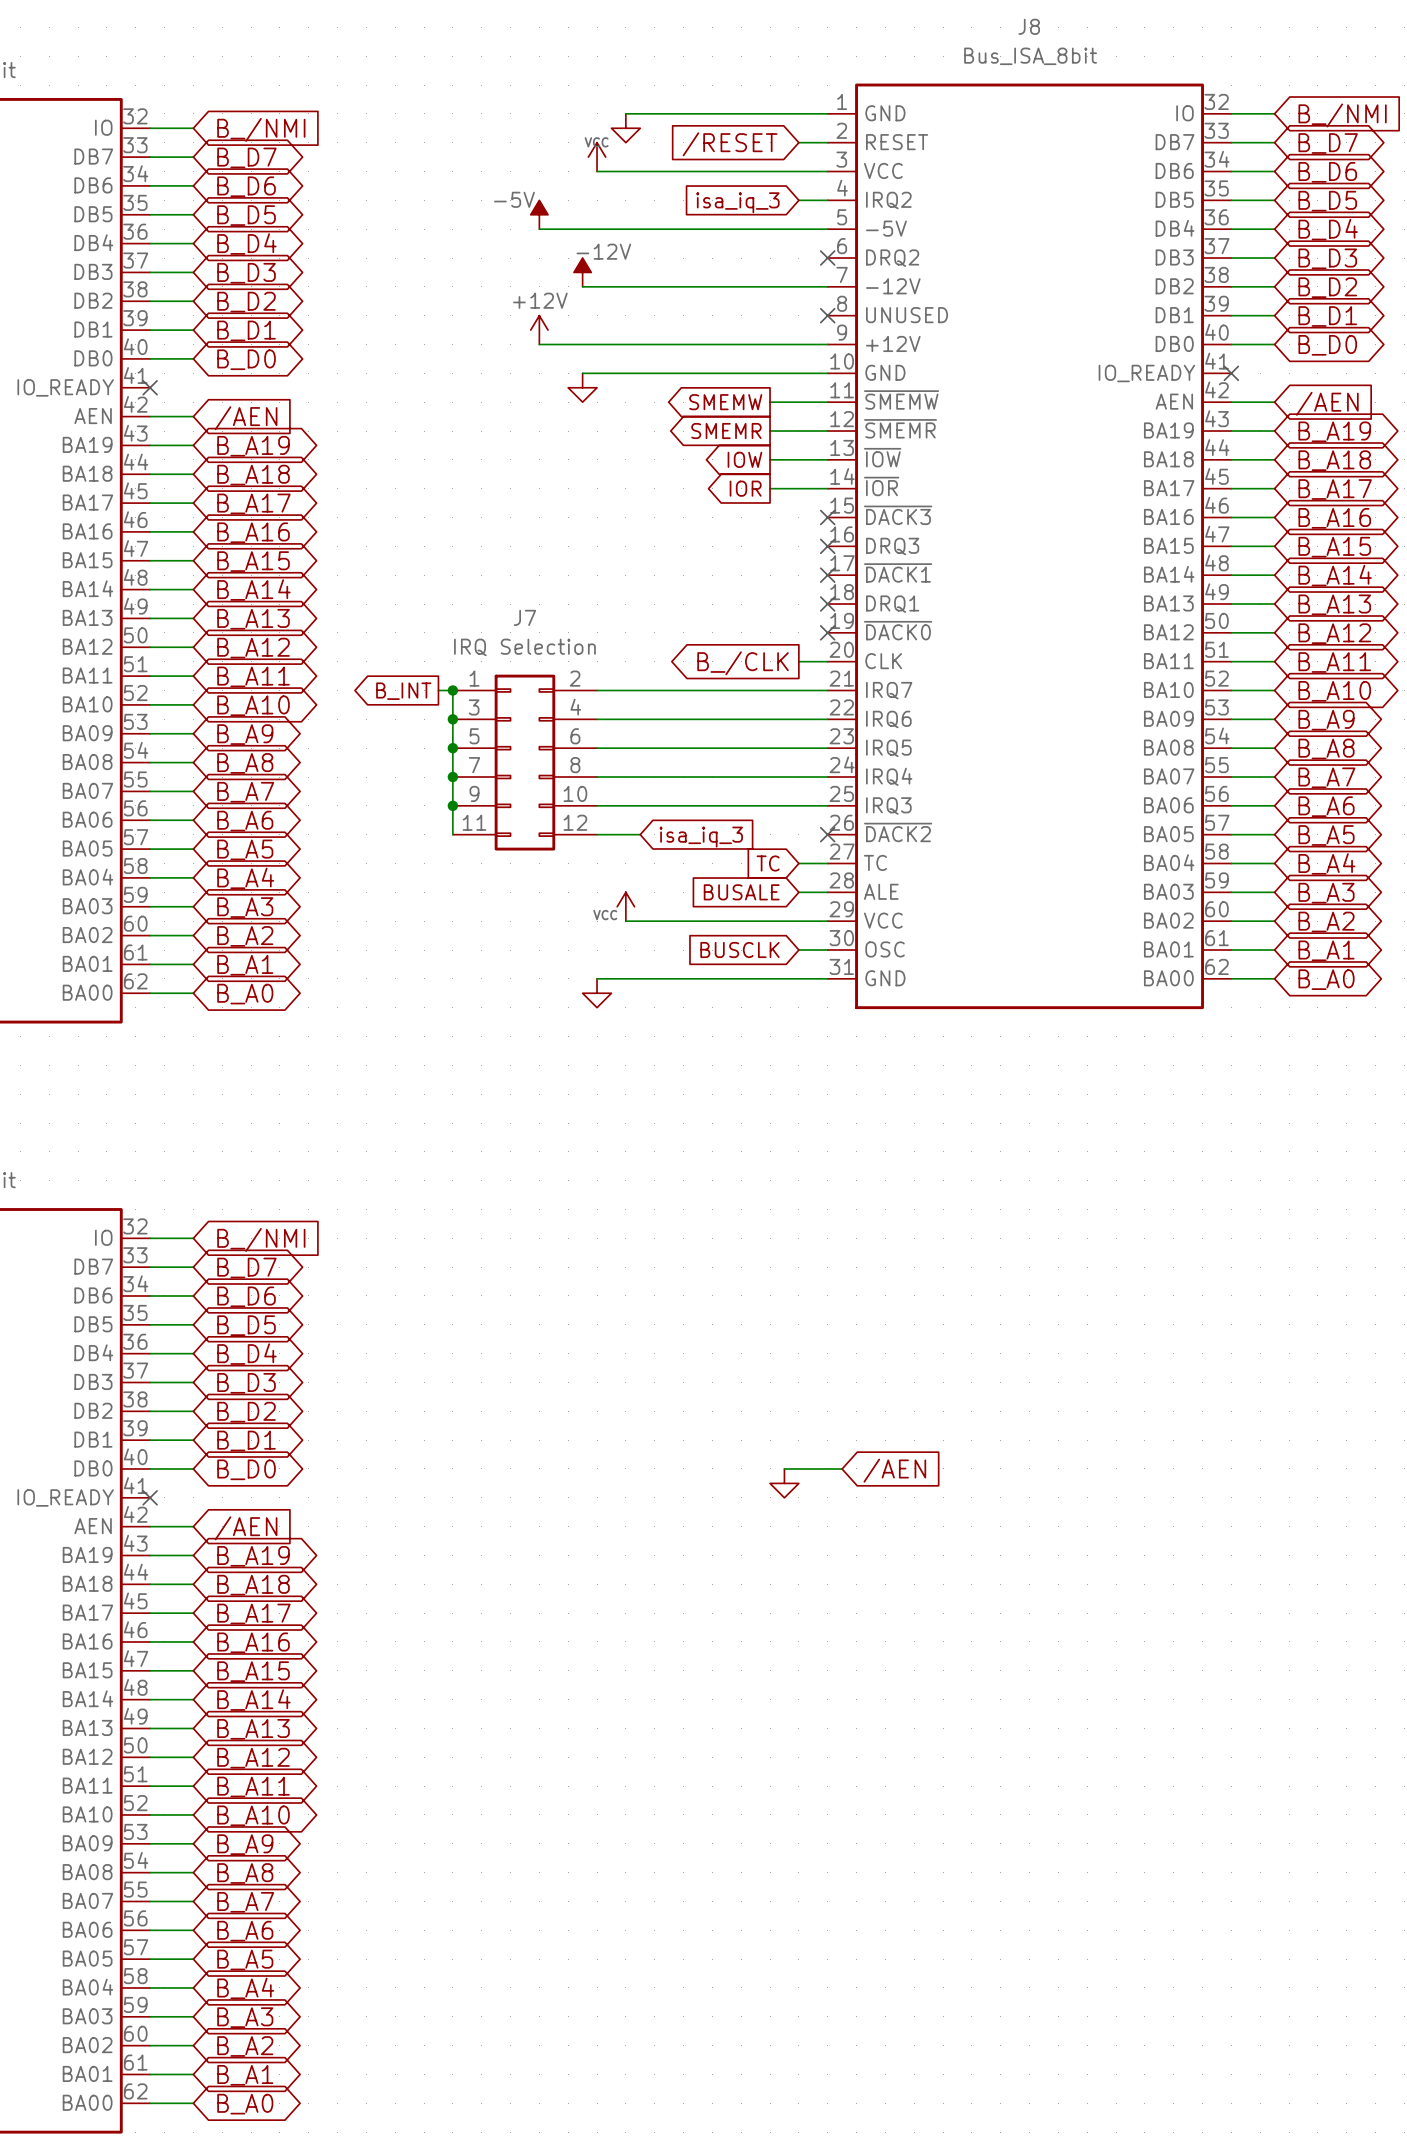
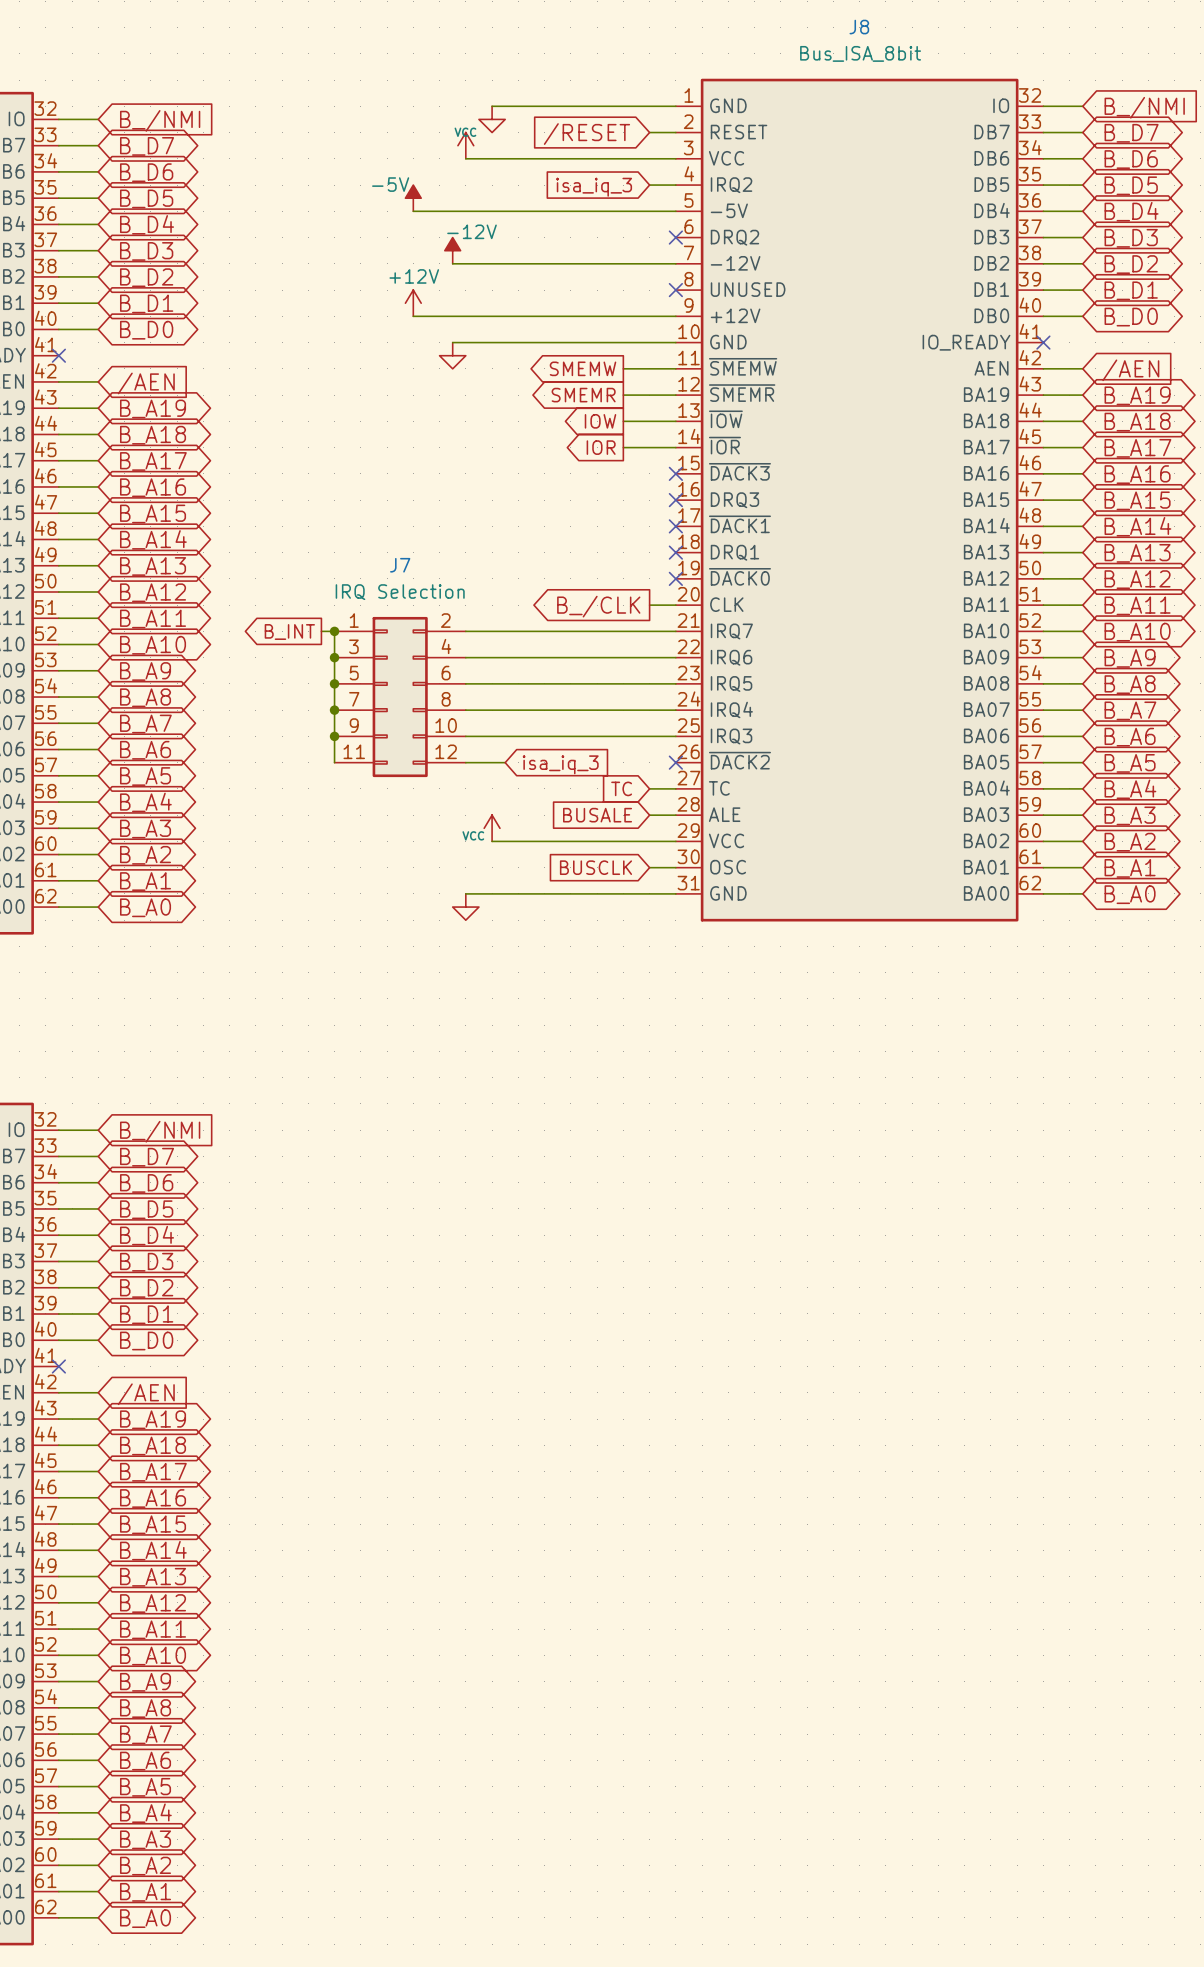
wire: (784, 1468) (842, 1468) -> none
global label: /AEN (894, 1470) -> none
power symbol: (784, 1483) -> none

